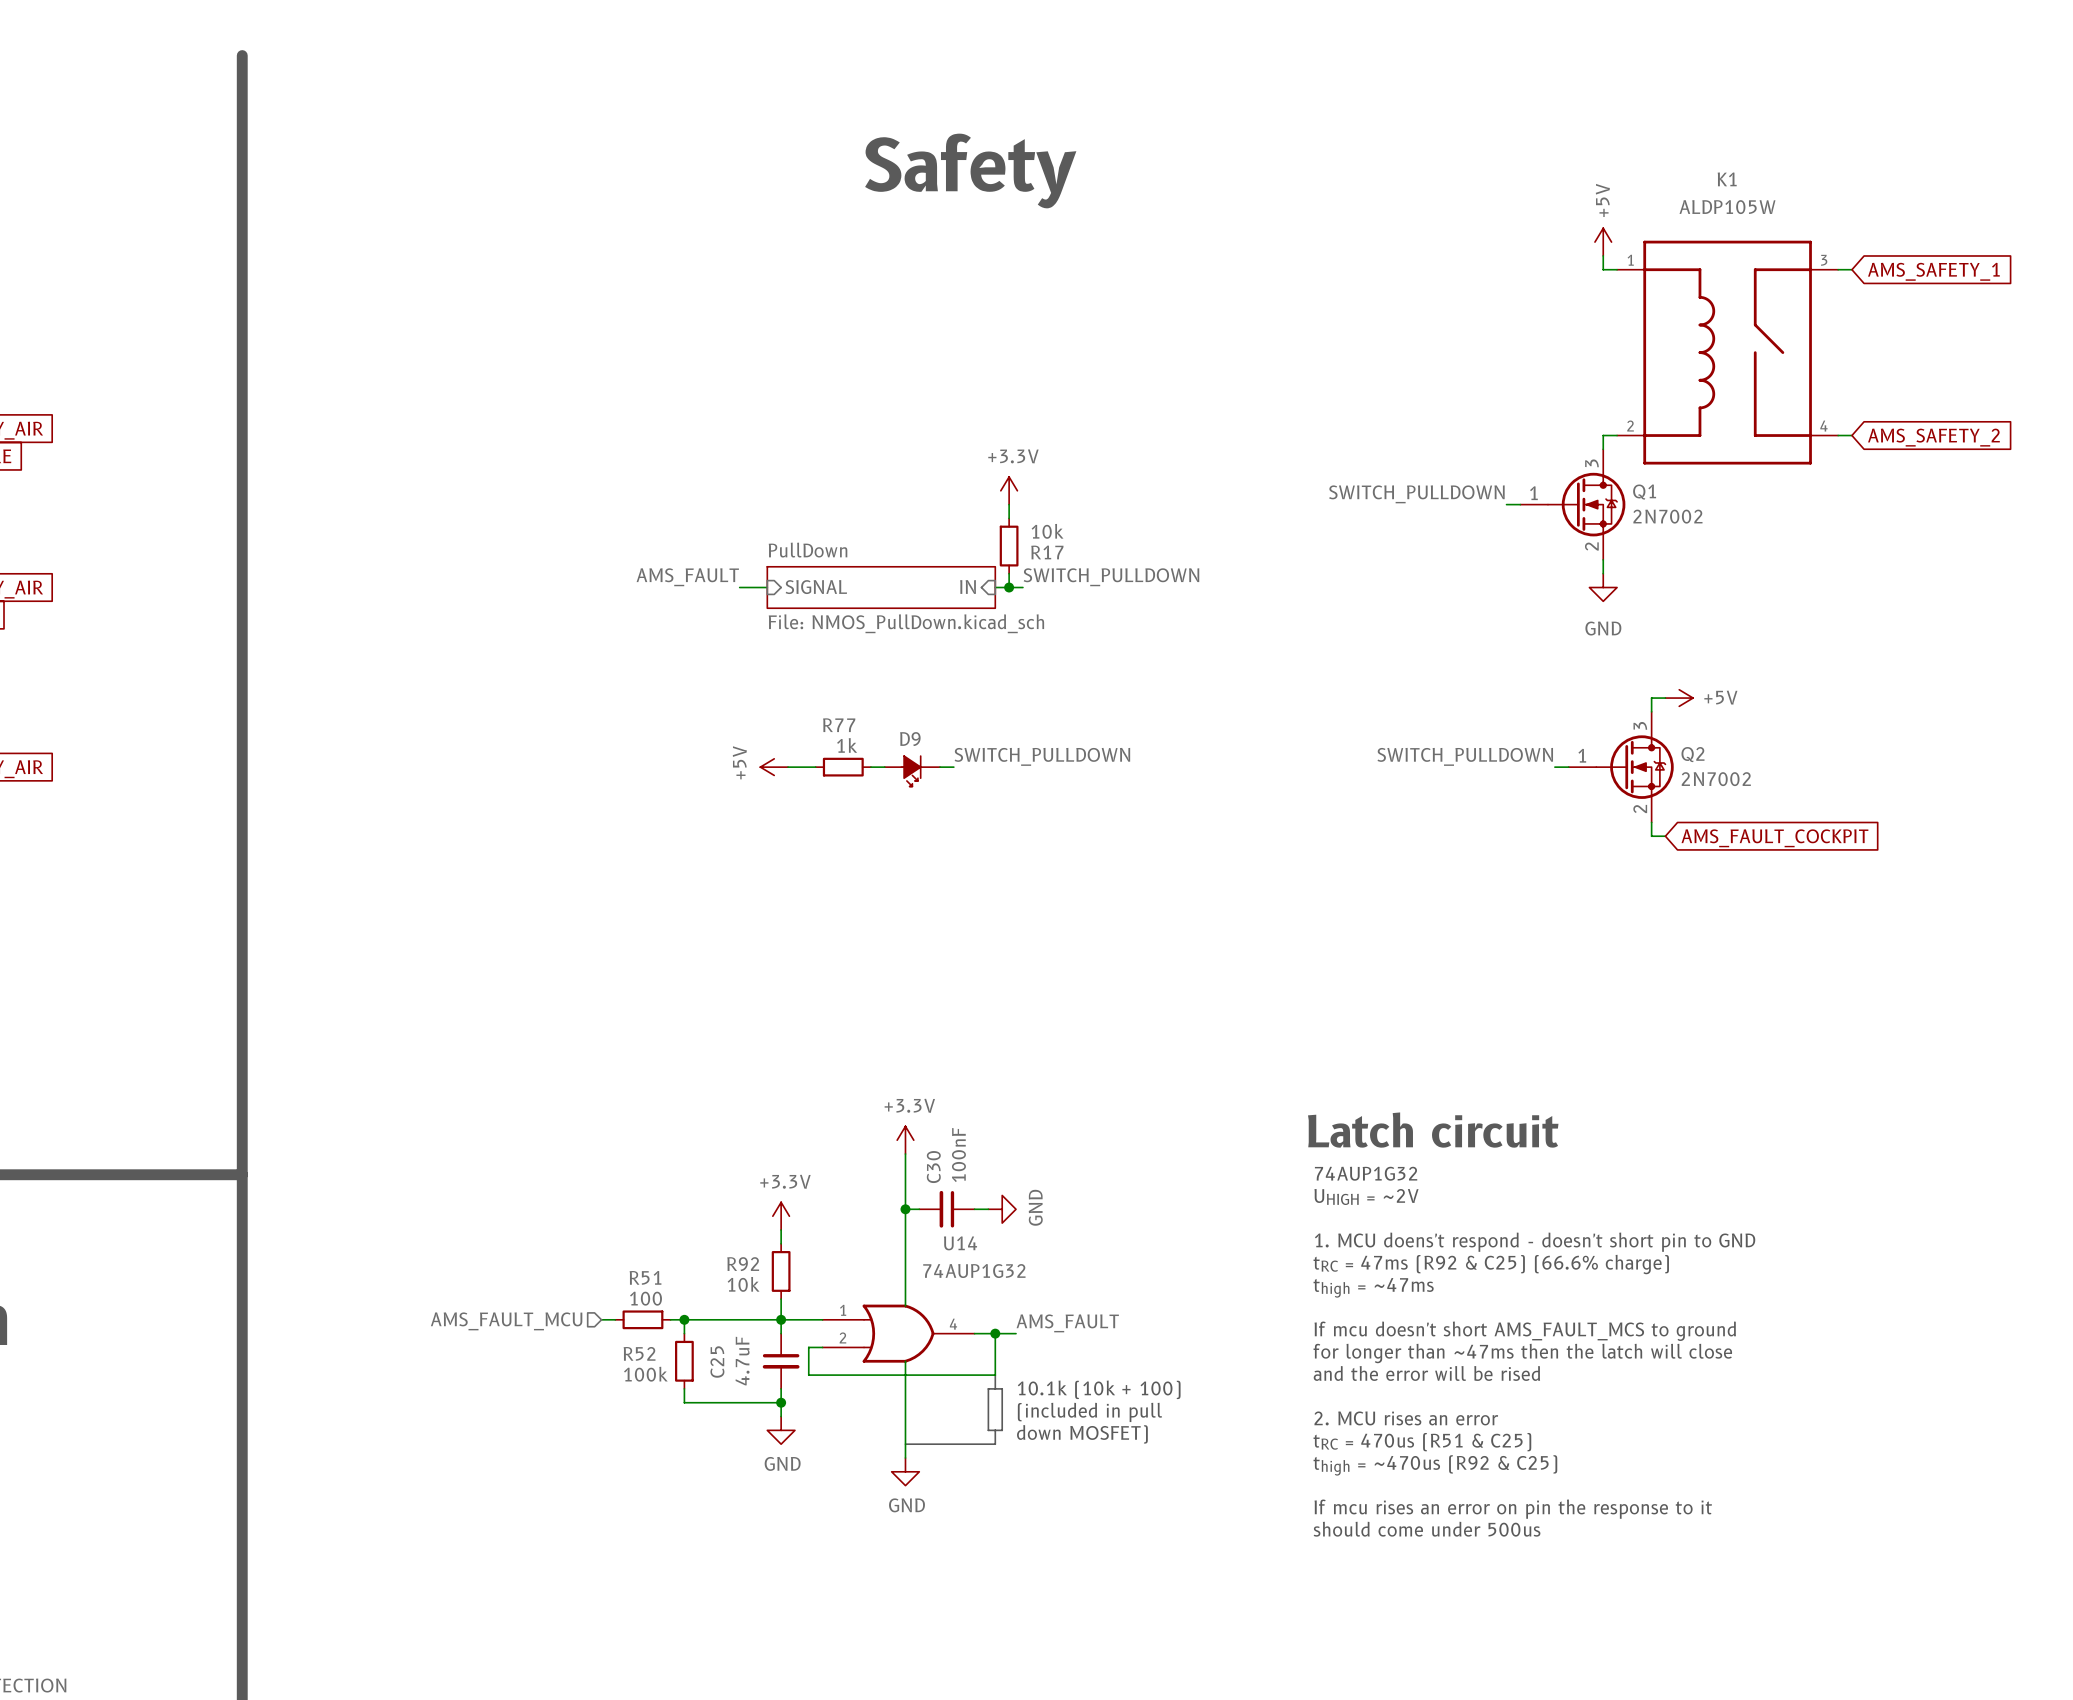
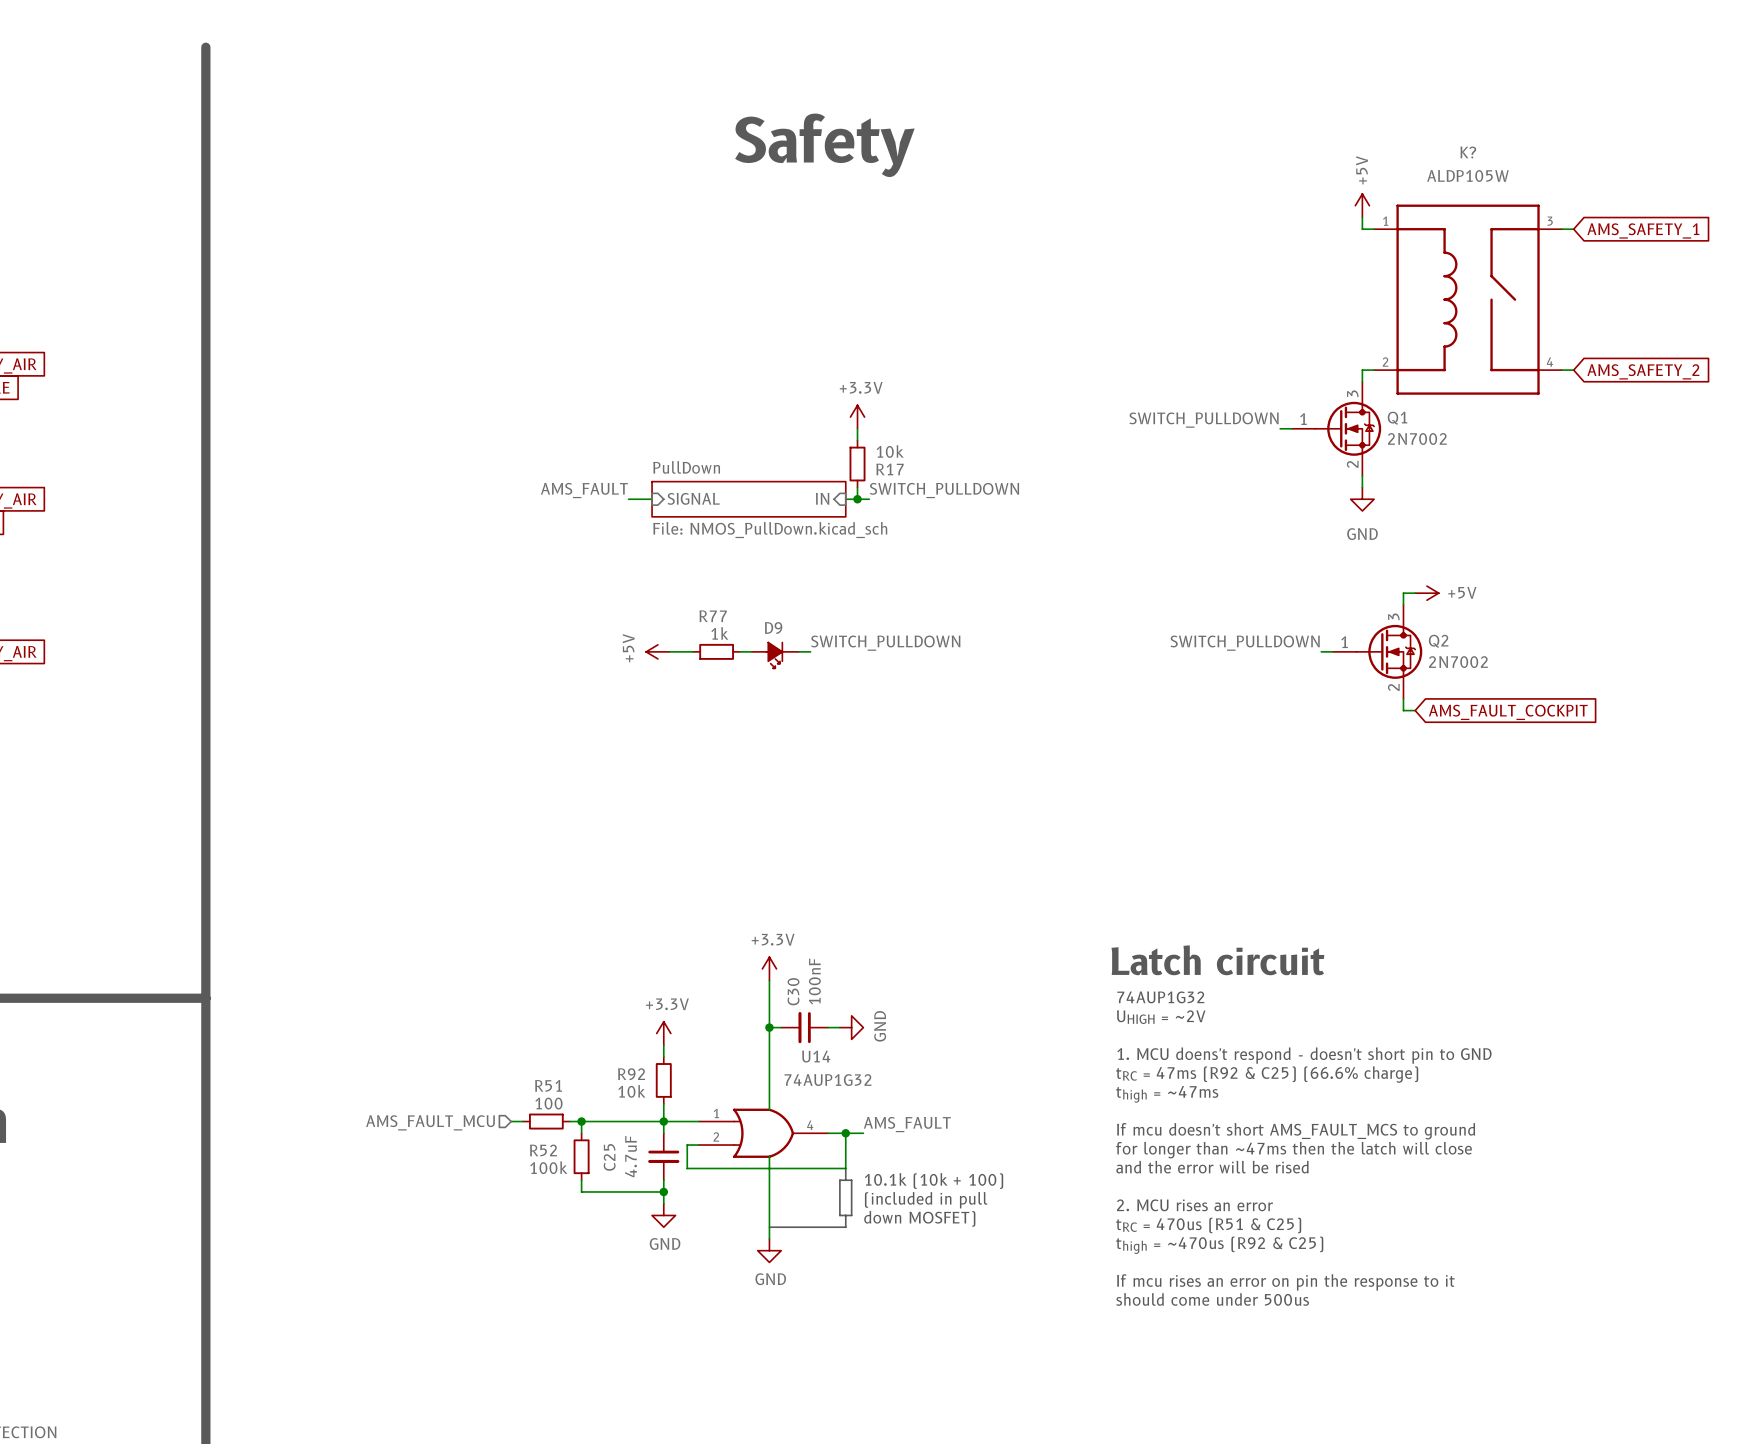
K1 name: K1 (1727, 179) -> K? (1468, 152)

